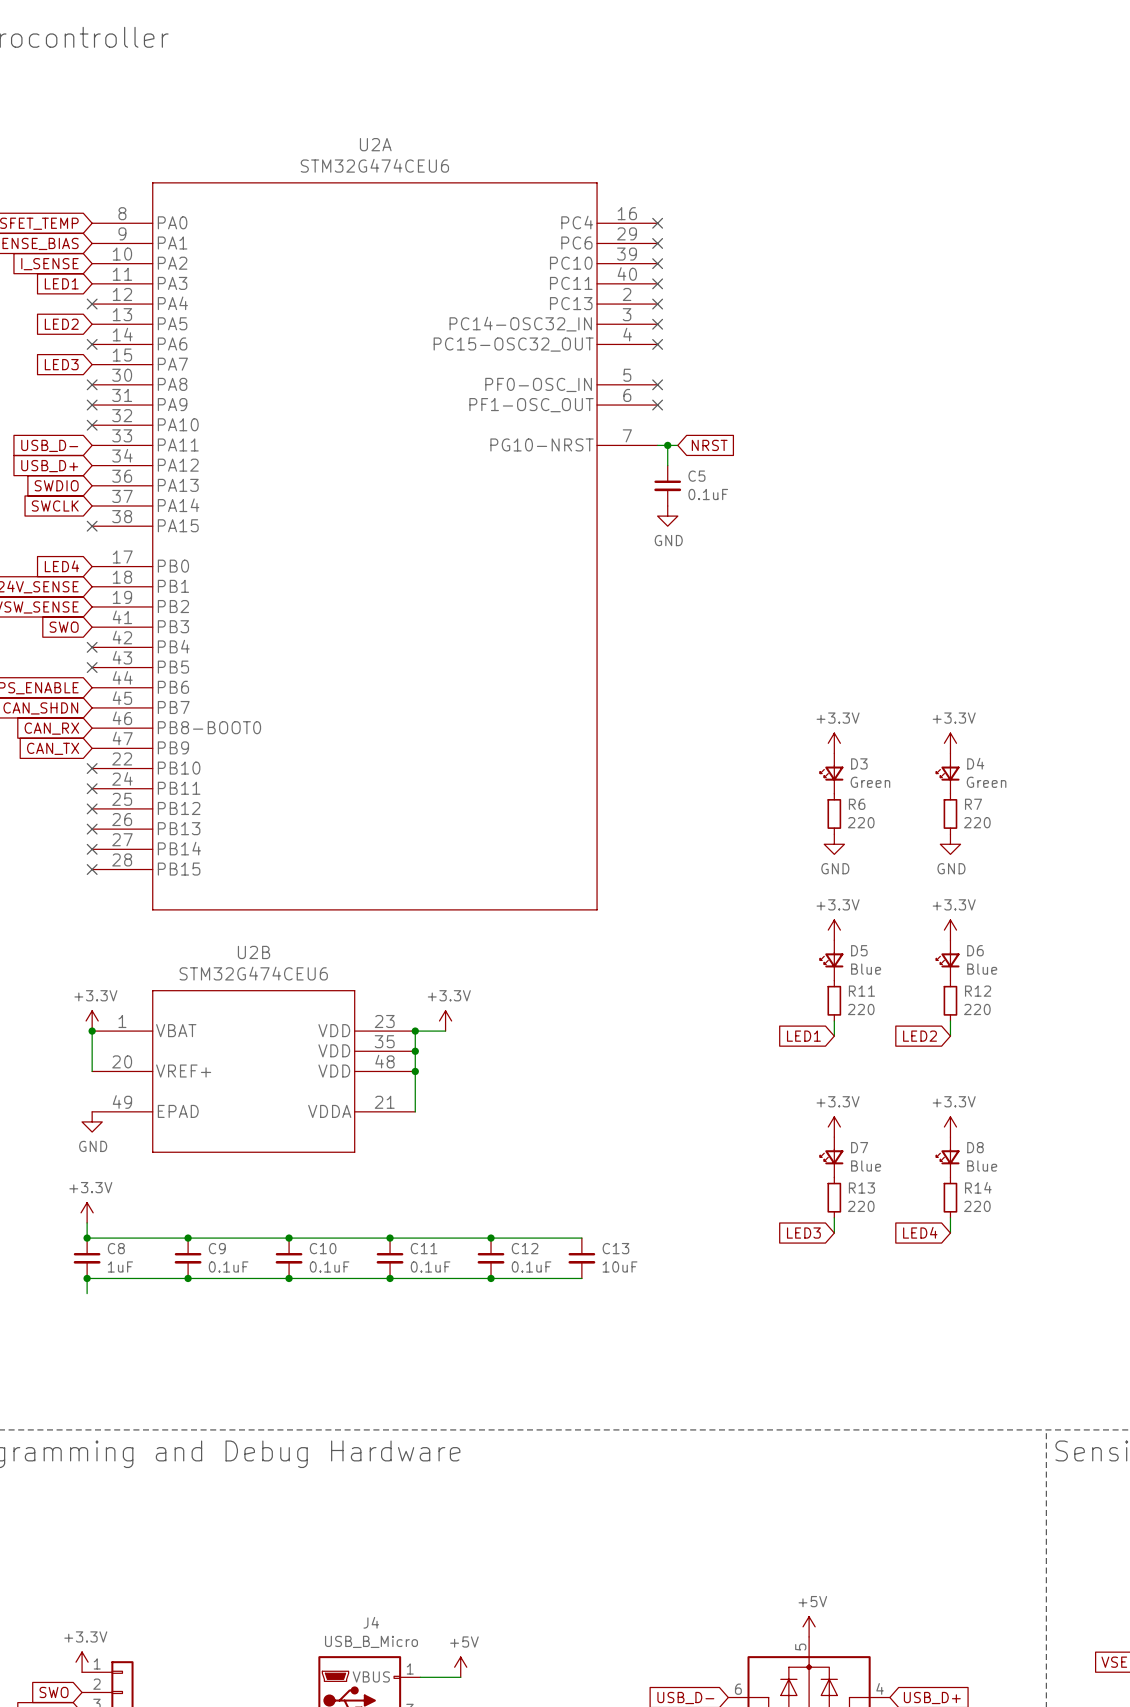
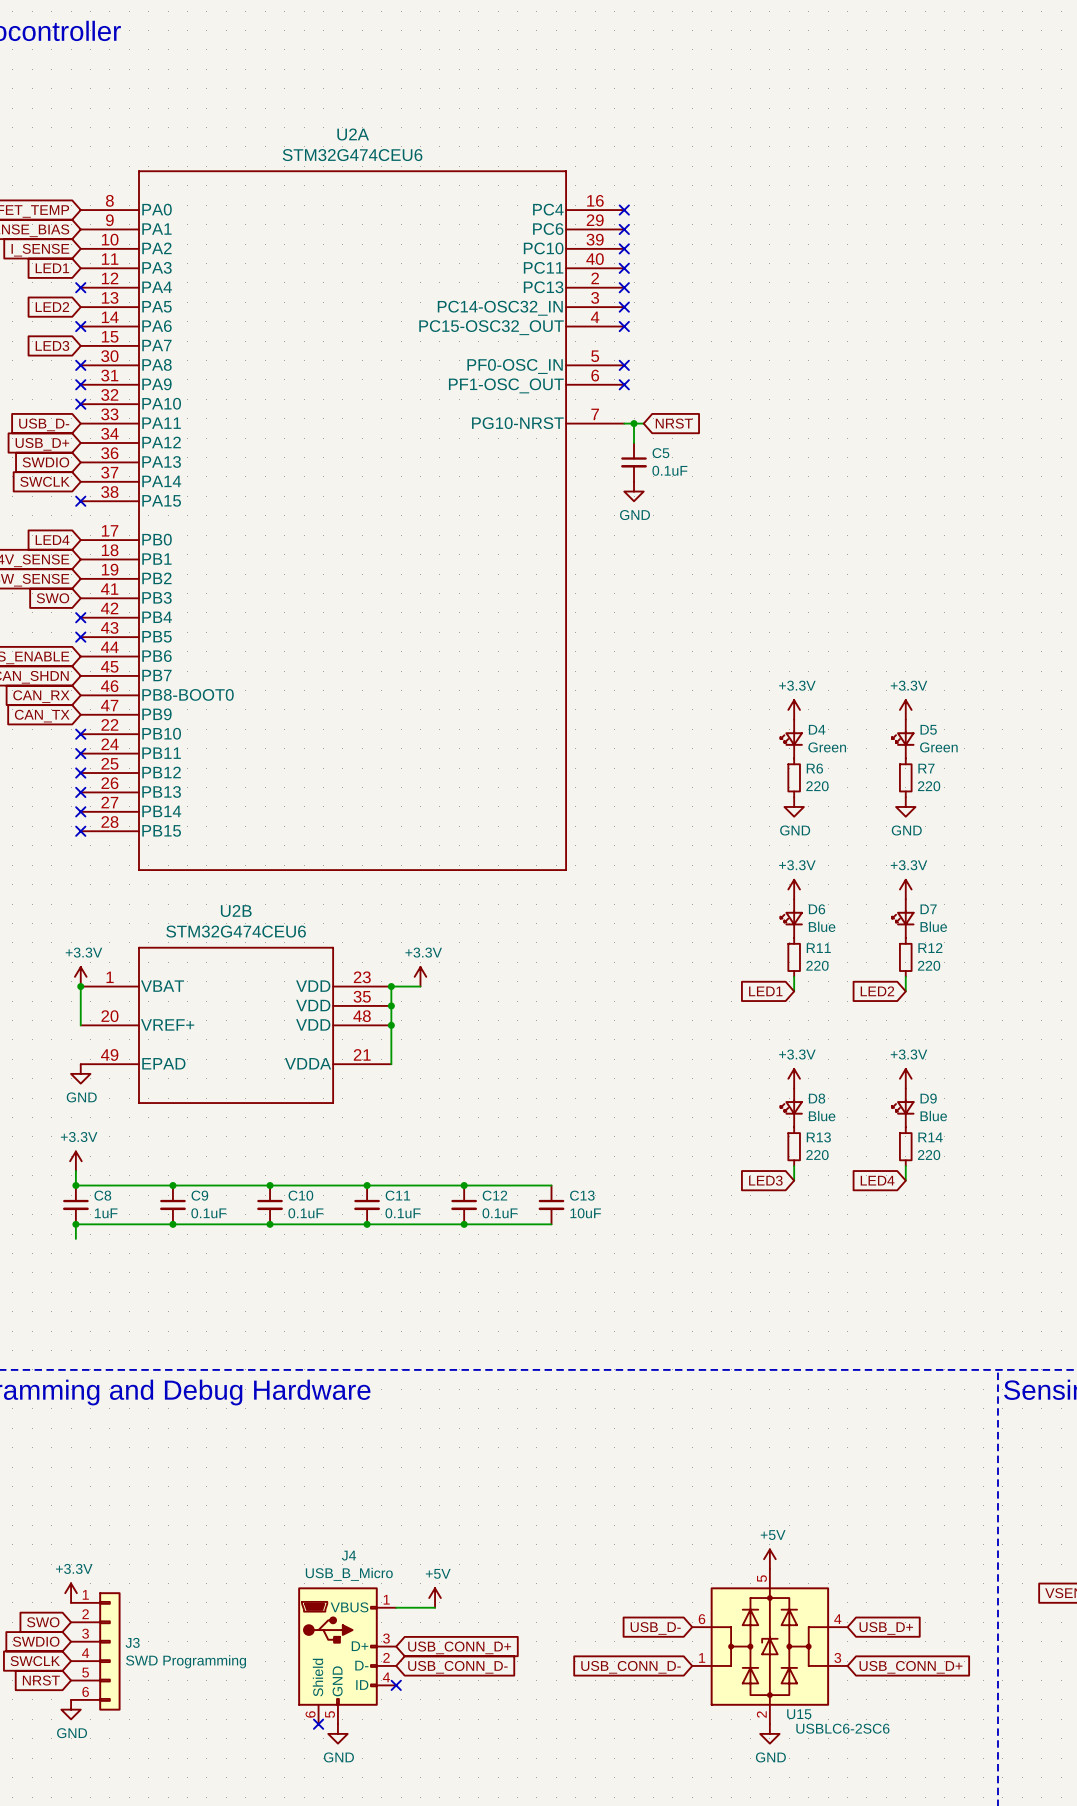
D3 name: D3 (859, 763) -> D4 (817, 729)
D4 name: D4 (975, 763) -> D5 (928, 729)
D5 name: D5 (859, 950) -> D6 (817, 909)
D6 name: D6 (975, 950) -> D7 (928, 909)
D7 name: D7 (859, 1147) -> D8 (817, 1098)
D8 name: D8 (975, 1147) -> D9 (928, 1098)

